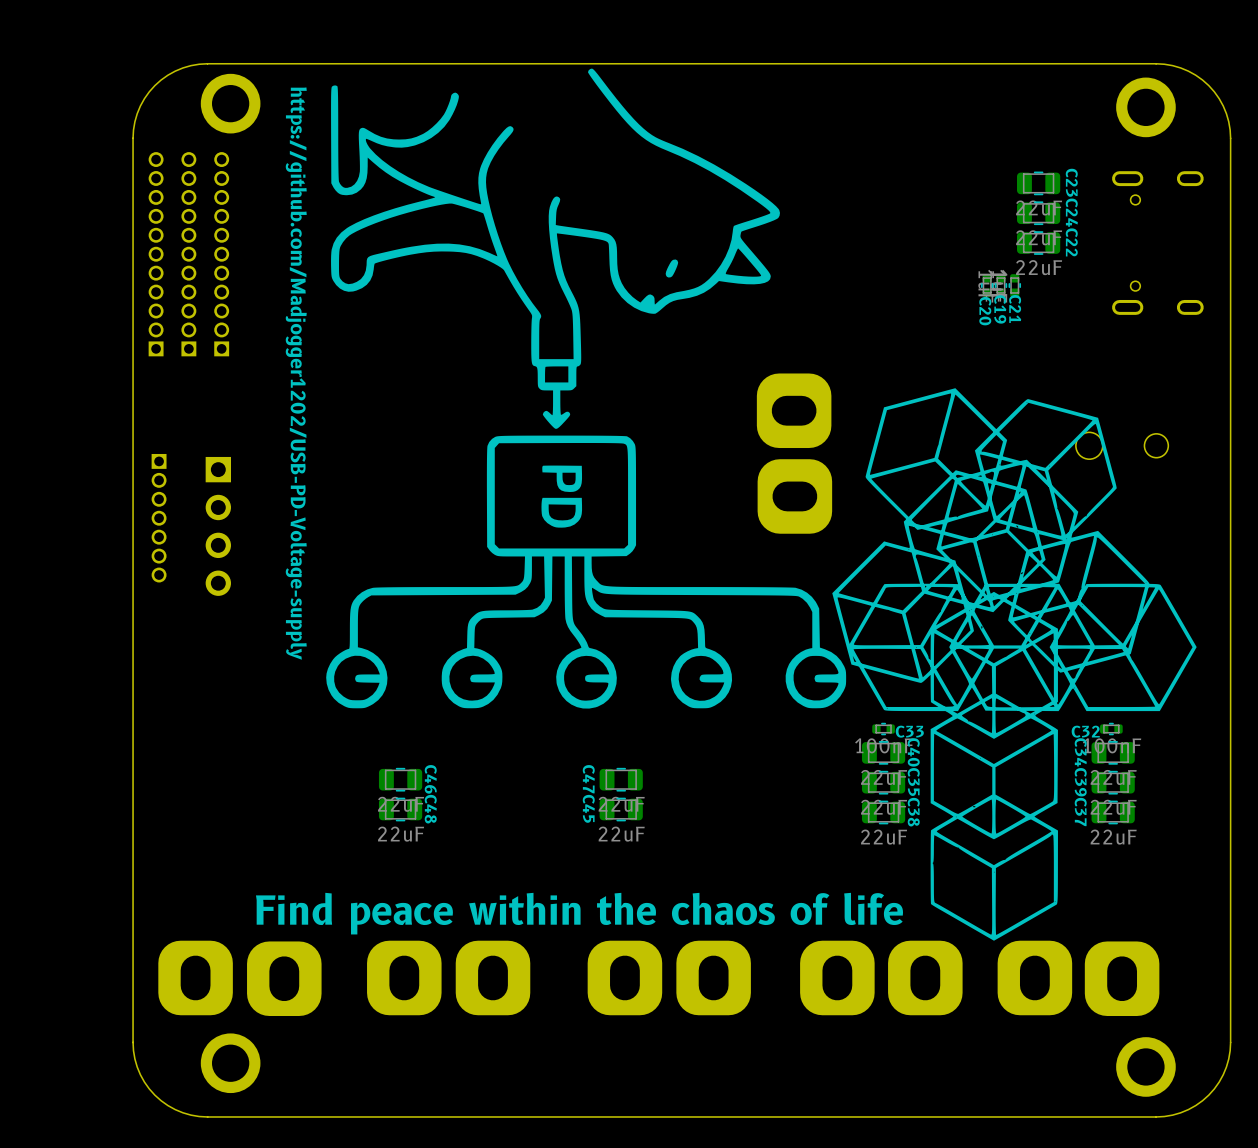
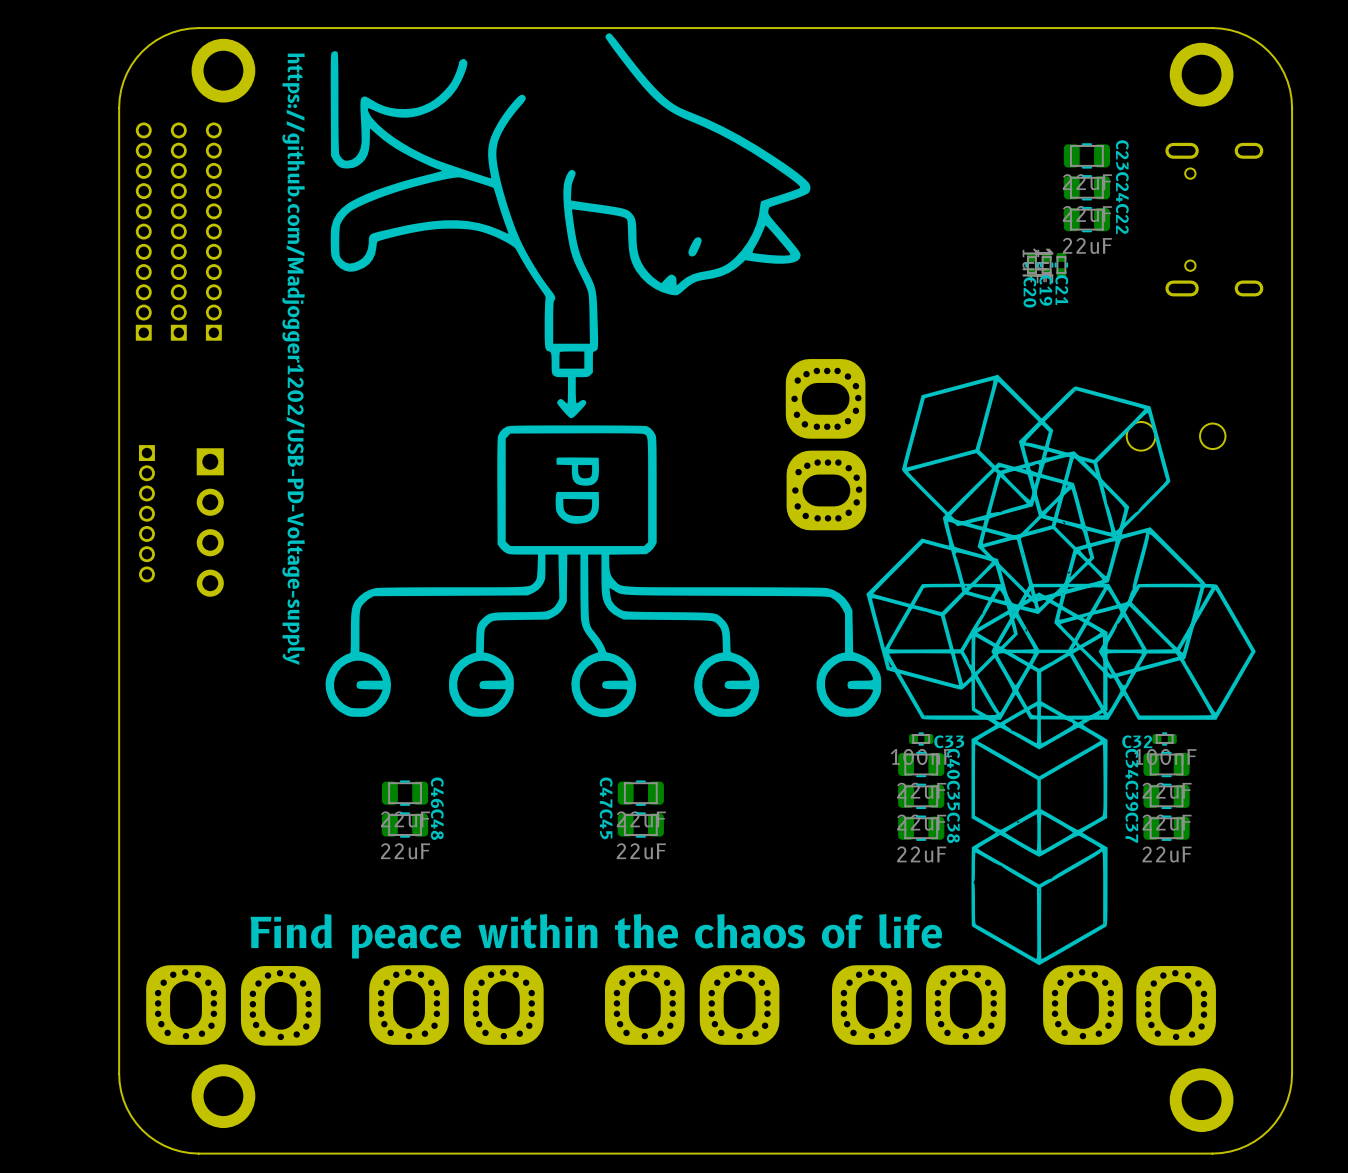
part footprint: [756, 373, 832, 449] -> [785, 359, 866, 439]
part footprint: [757, 459, 833, 534] -> [786, 450, 867, 531]
part footprint: [158, 940, 233, 1016] -> [146, 965, 226, 1045]
part footprint: [367, 940, 442, 1016] -> [369, 965, 449, 1045]
part footprint: [455, 940, 531, 1016] -> [463, 965, 544, 1045]
part footprint: [587, 940, 663, 1016] -> [604, 965, 685, 1045]
part footprint: [676, 940, 751, 1016] -> [699, 965, 780, 1045]
part footprint: [800, 940, 875, 1016] -> [832, 965, 912, 1045]
part footprint: [888, 940, 963, 1016] -> [925, 965, 1006, 1045]
part footprint: [997, 940, 1073, 1016] -> [1043, 965, 1123, 1045]
part footprint: [247, 941, 322, 1016] -> [240, 966, 321, 1046]
part footprint: [1084, 941, 1160, 1016] -> [1136, 966, 1216, 1046]

